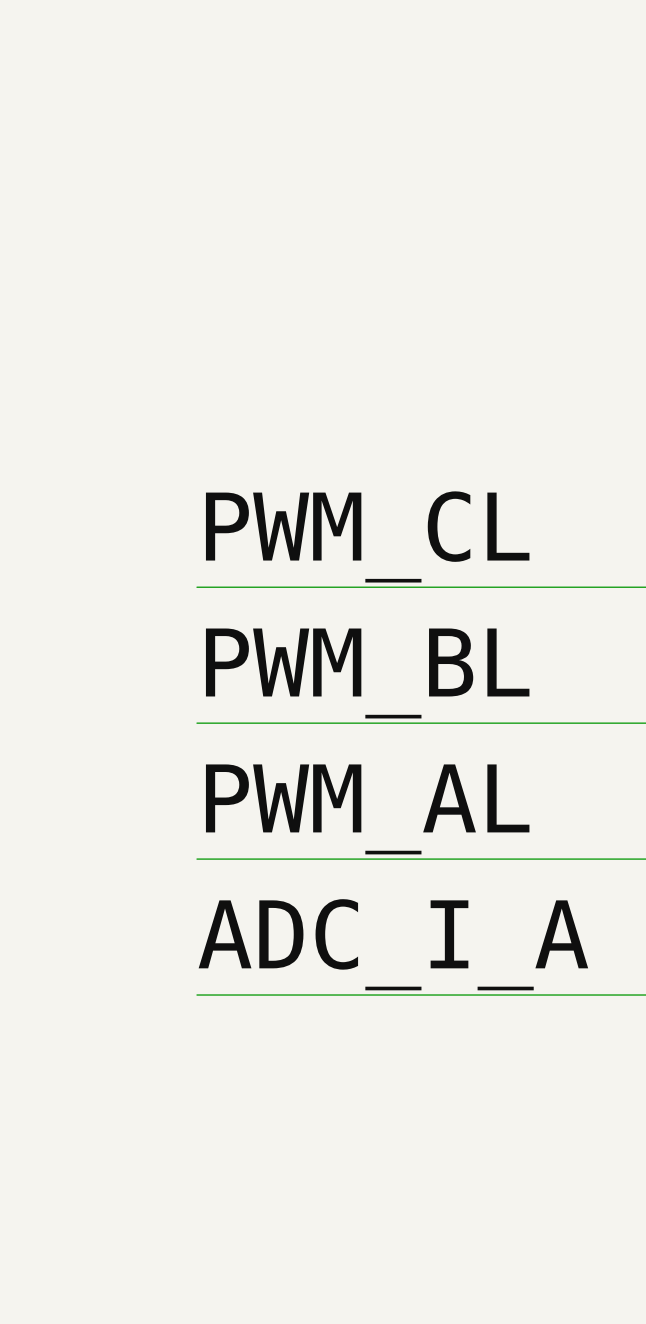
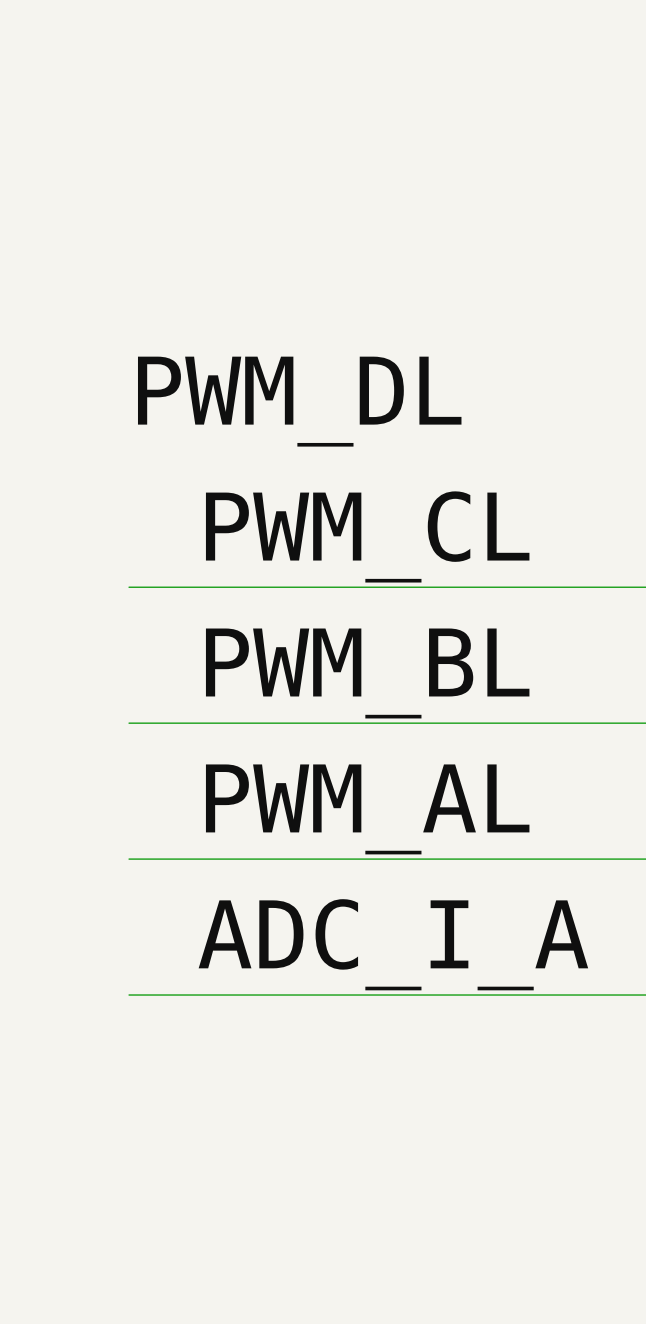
label: none -> PWM_DL (299, 401)
wire: none -> (129, 587) (196, 587)
wire: none -> (129, 723) (196, 723)
wire: none -> (129, 859) (196, 859)
wire: none -> (129, 995) (196, 995)

